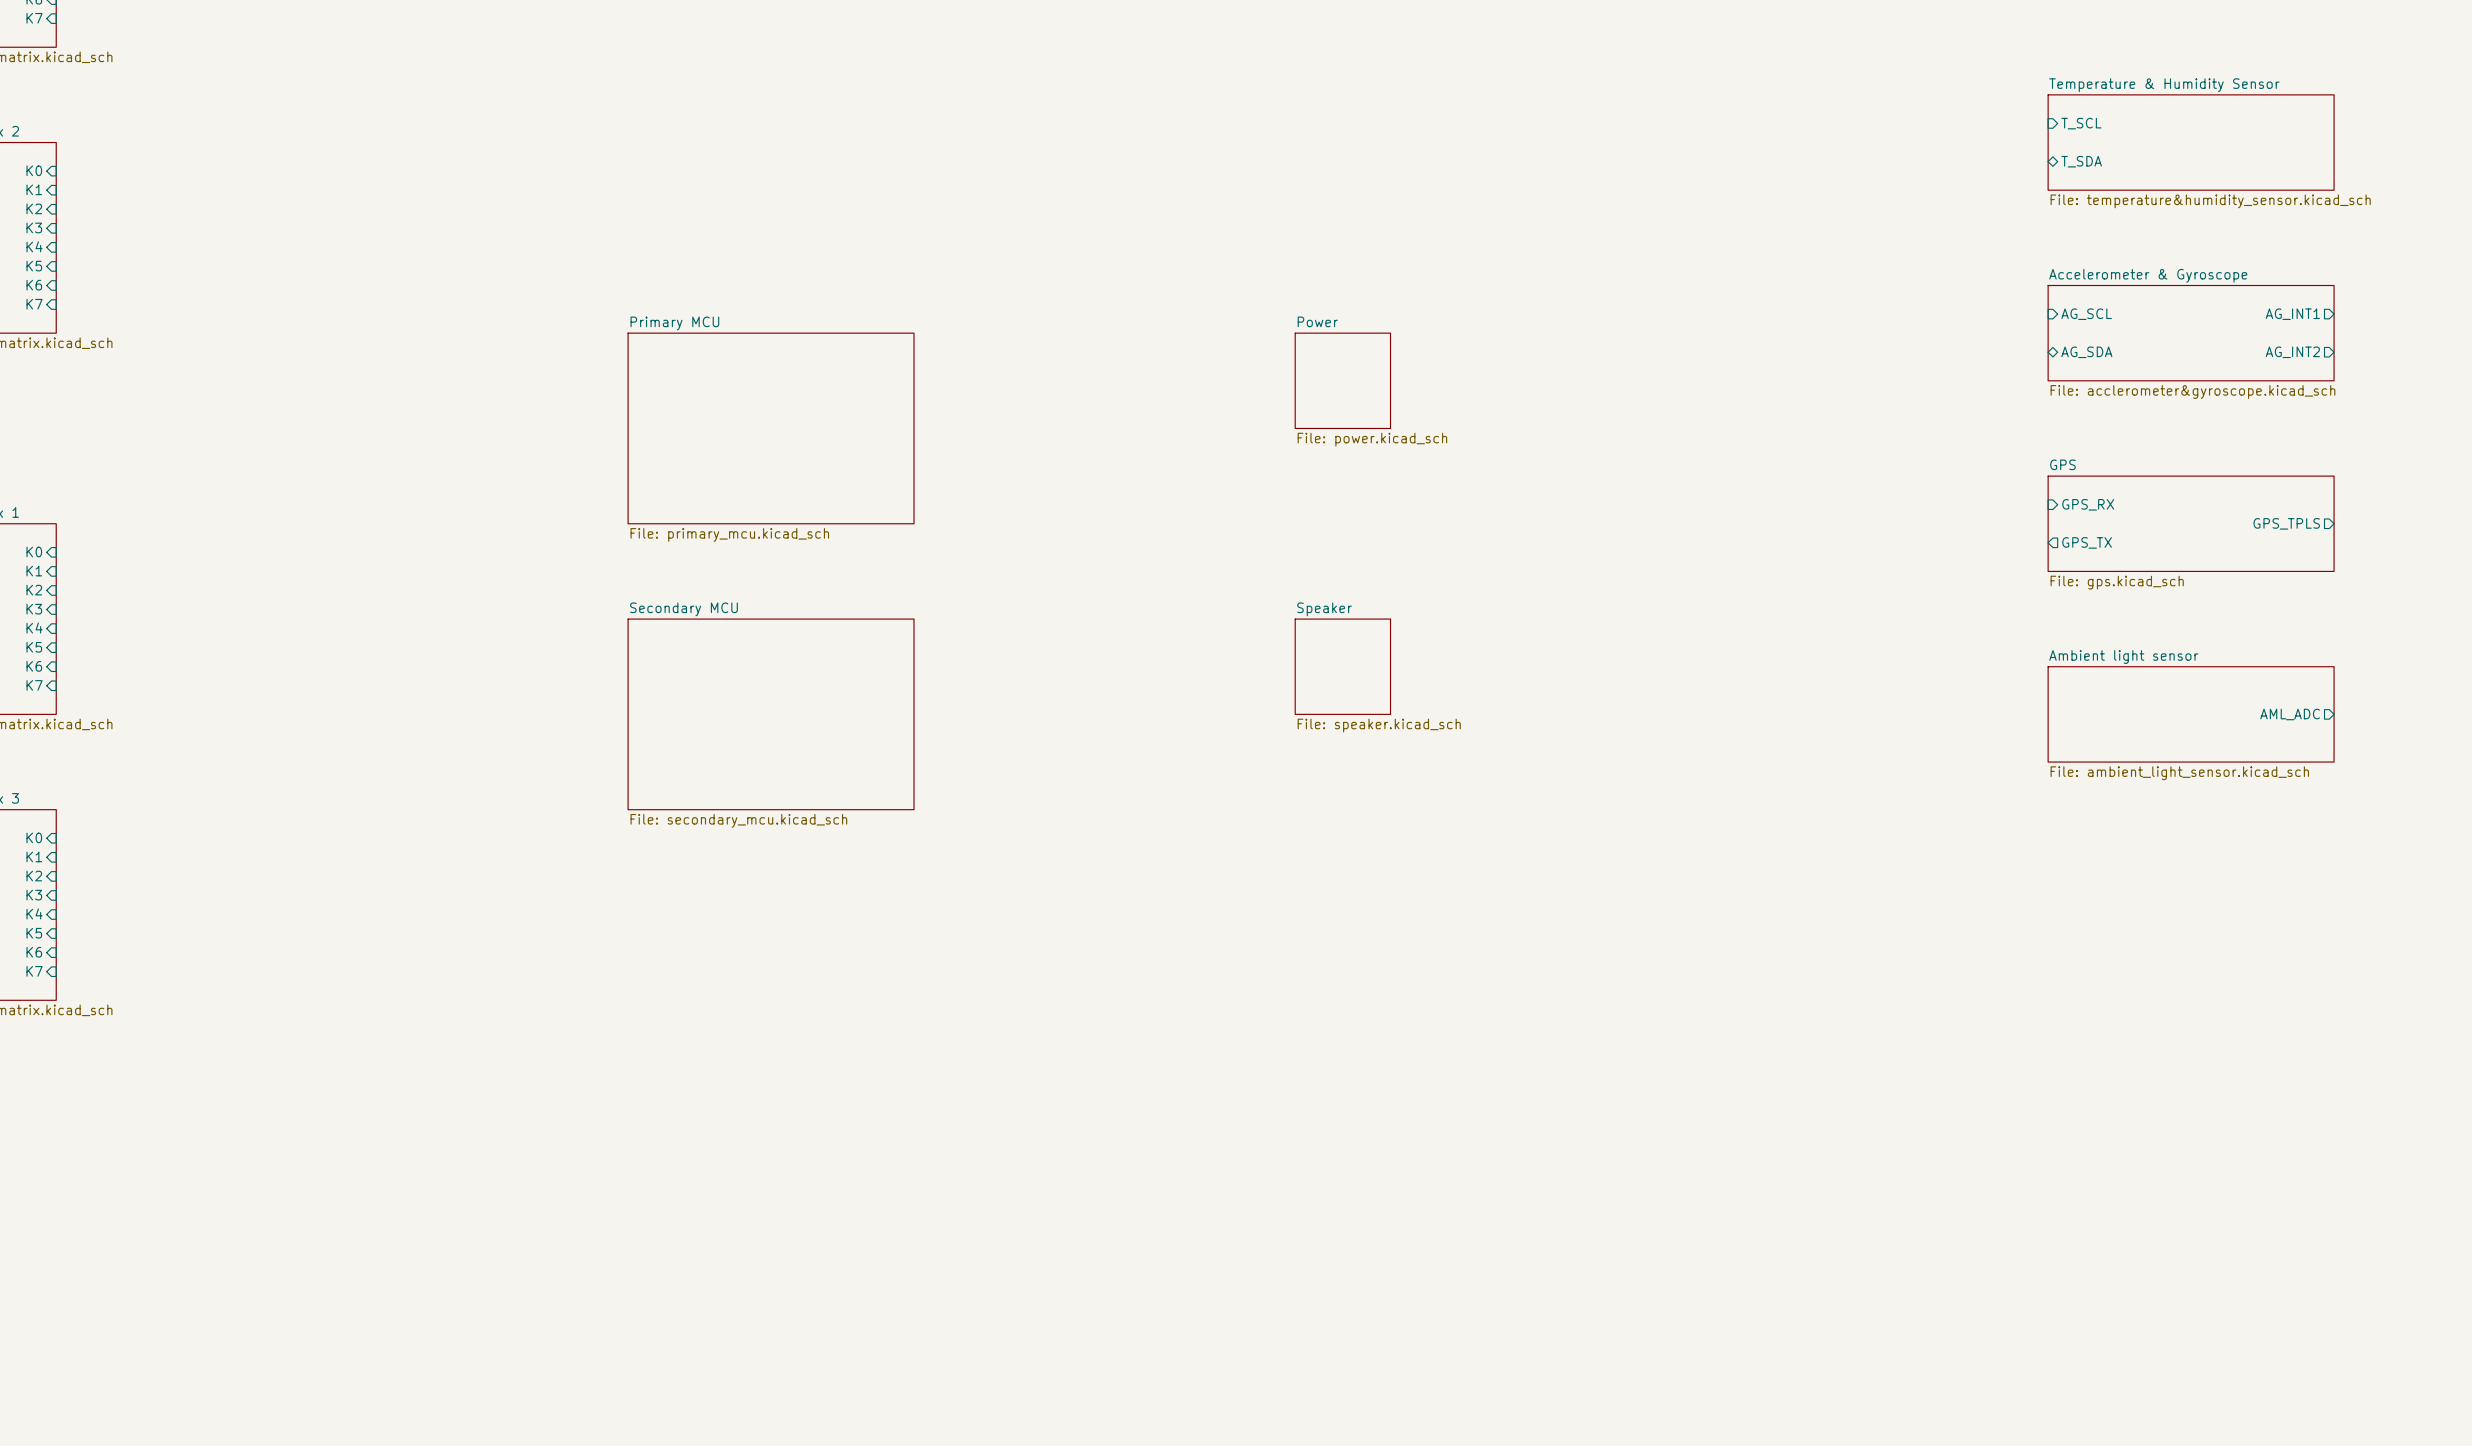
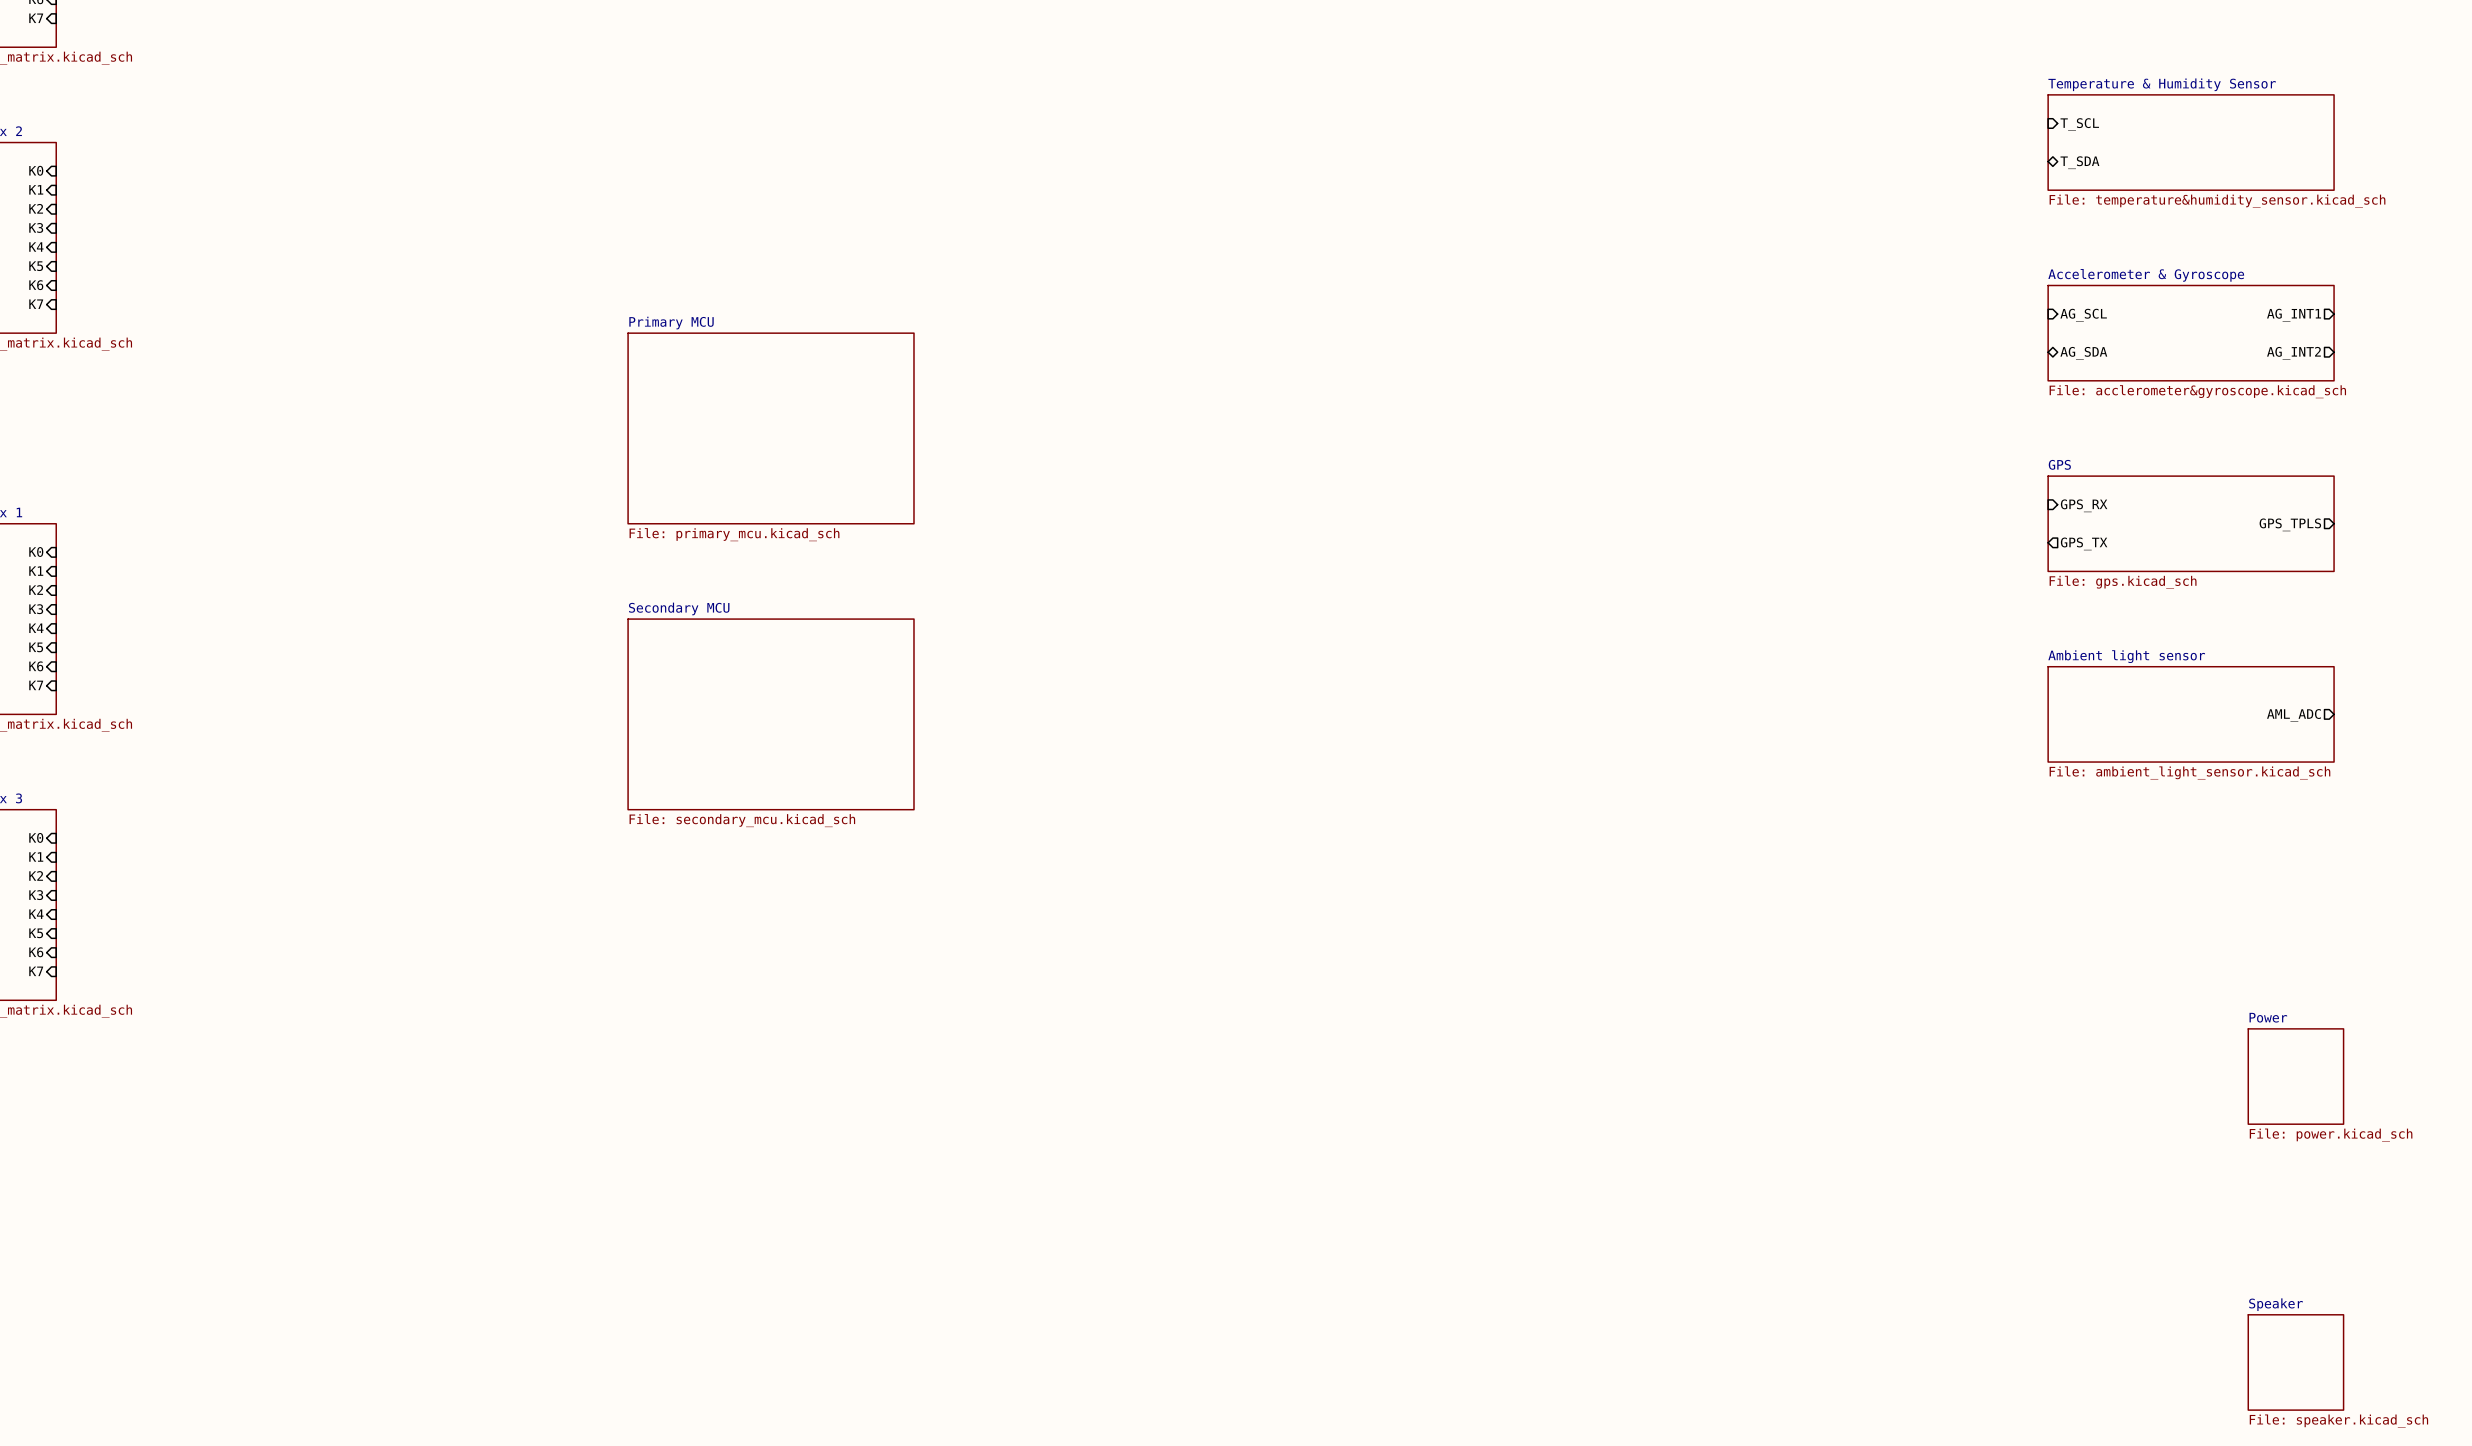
sheet Power: File: power.kicad_sch (1342, 380) -> none
sheet Speaker: File: speaker.kicad_sch (1342, 666) -> none
sheet Power: none -> File: power.kicad_sch (2295, 1076)
sheet Speaker: none -> File: speaker.kicad_sch (2295, 1362)

